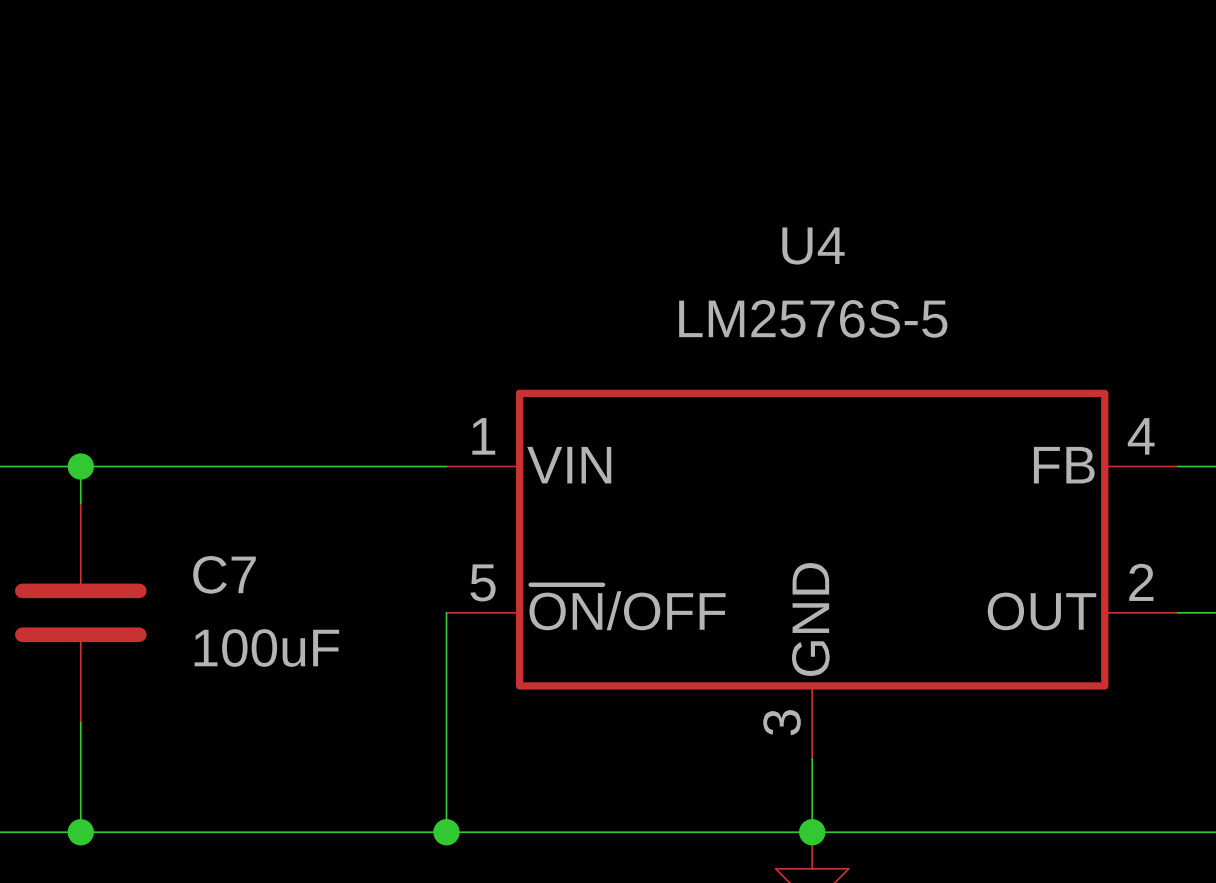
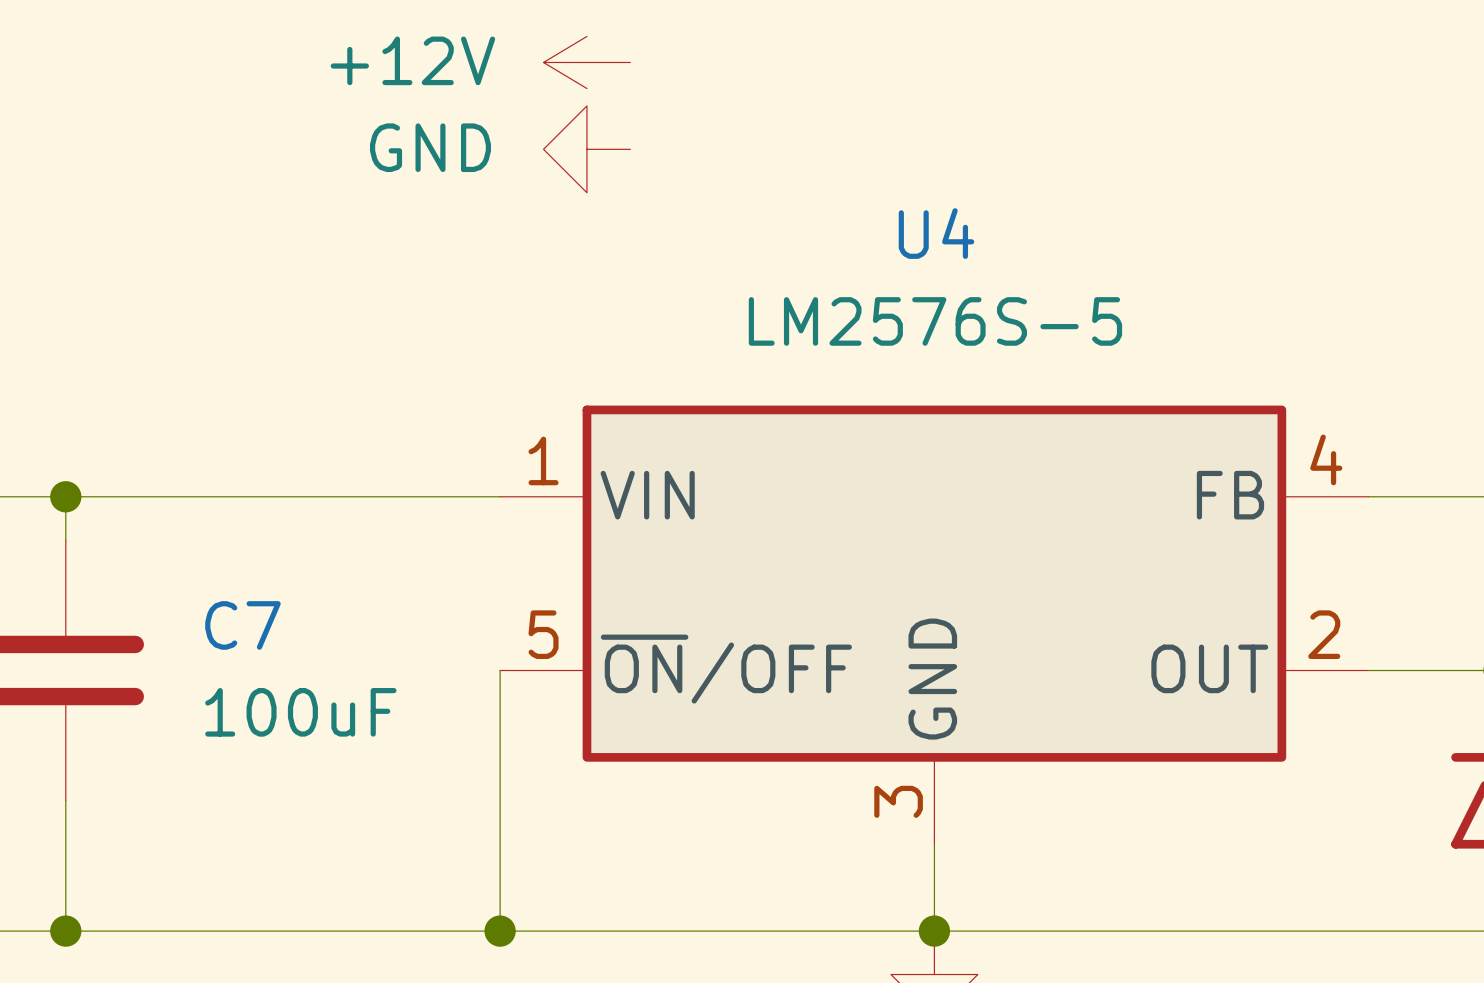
power symbol: none -> +12V (586, 62)
power symbol: none -> GND (586, 149)

